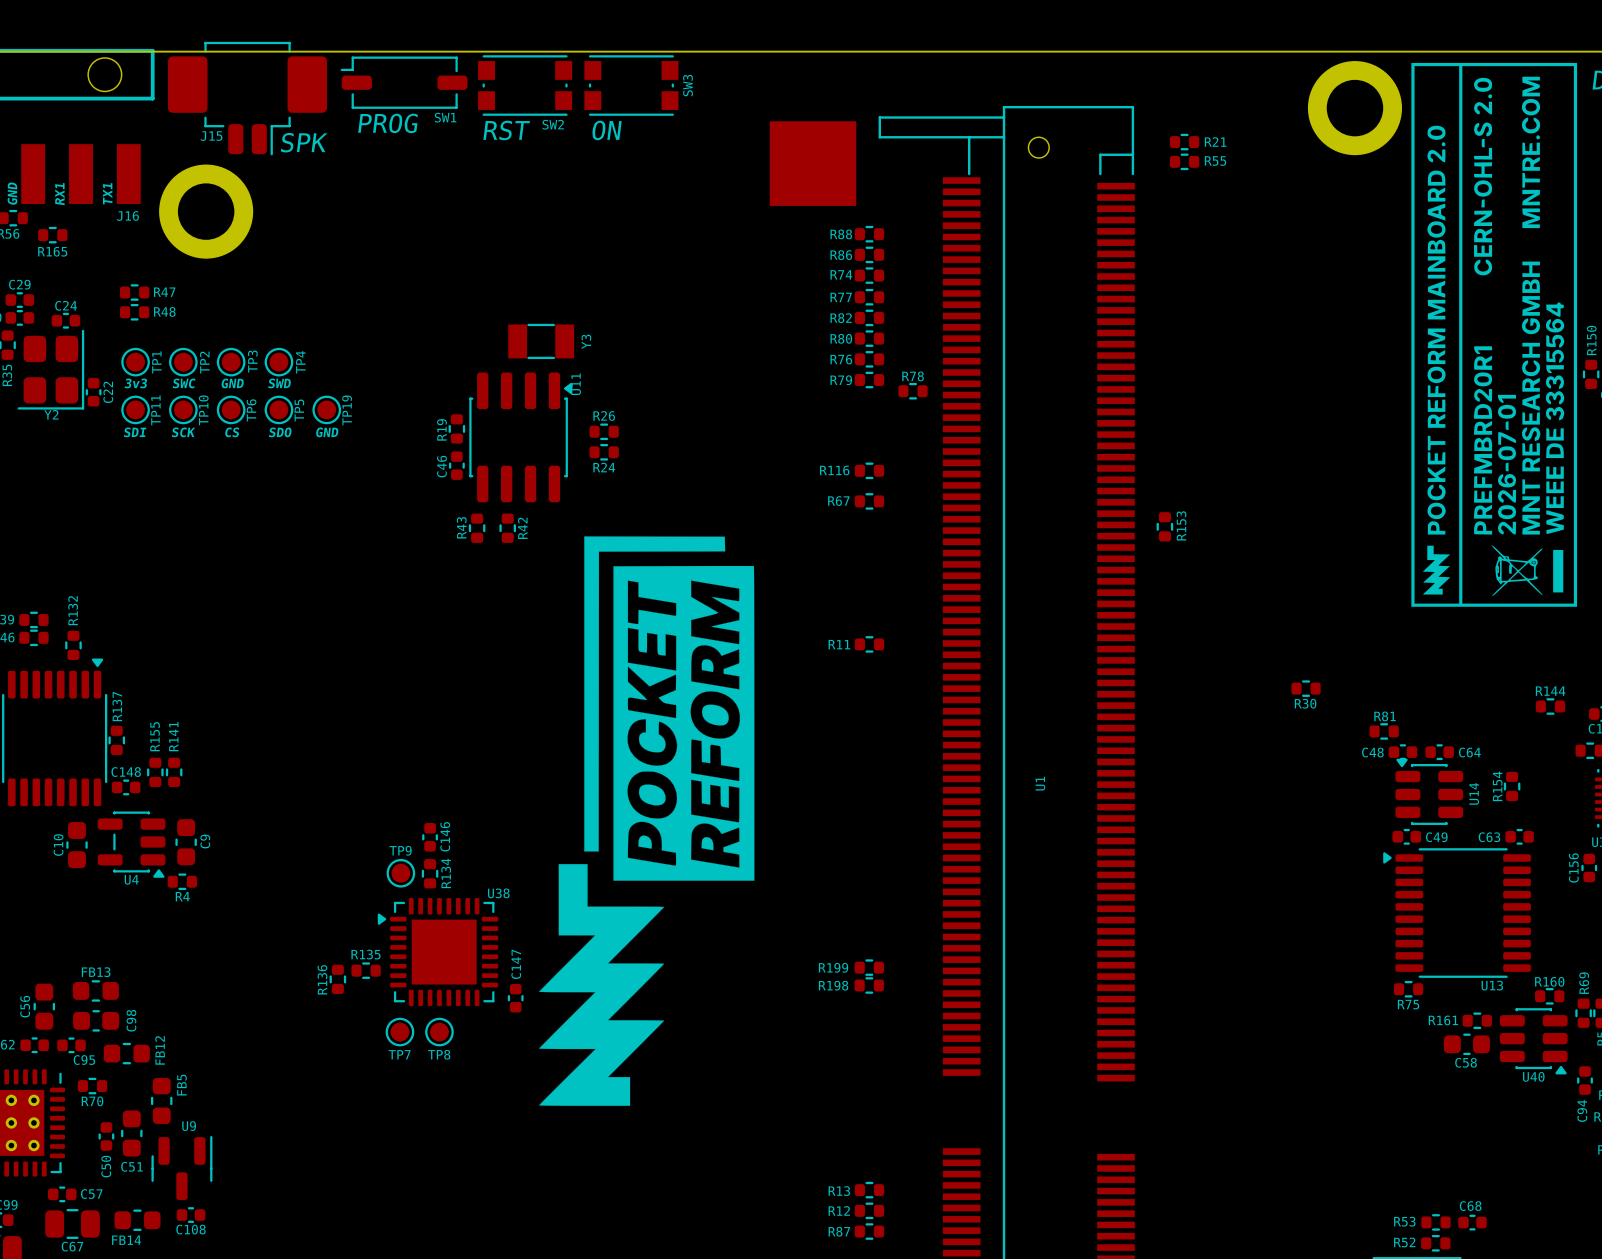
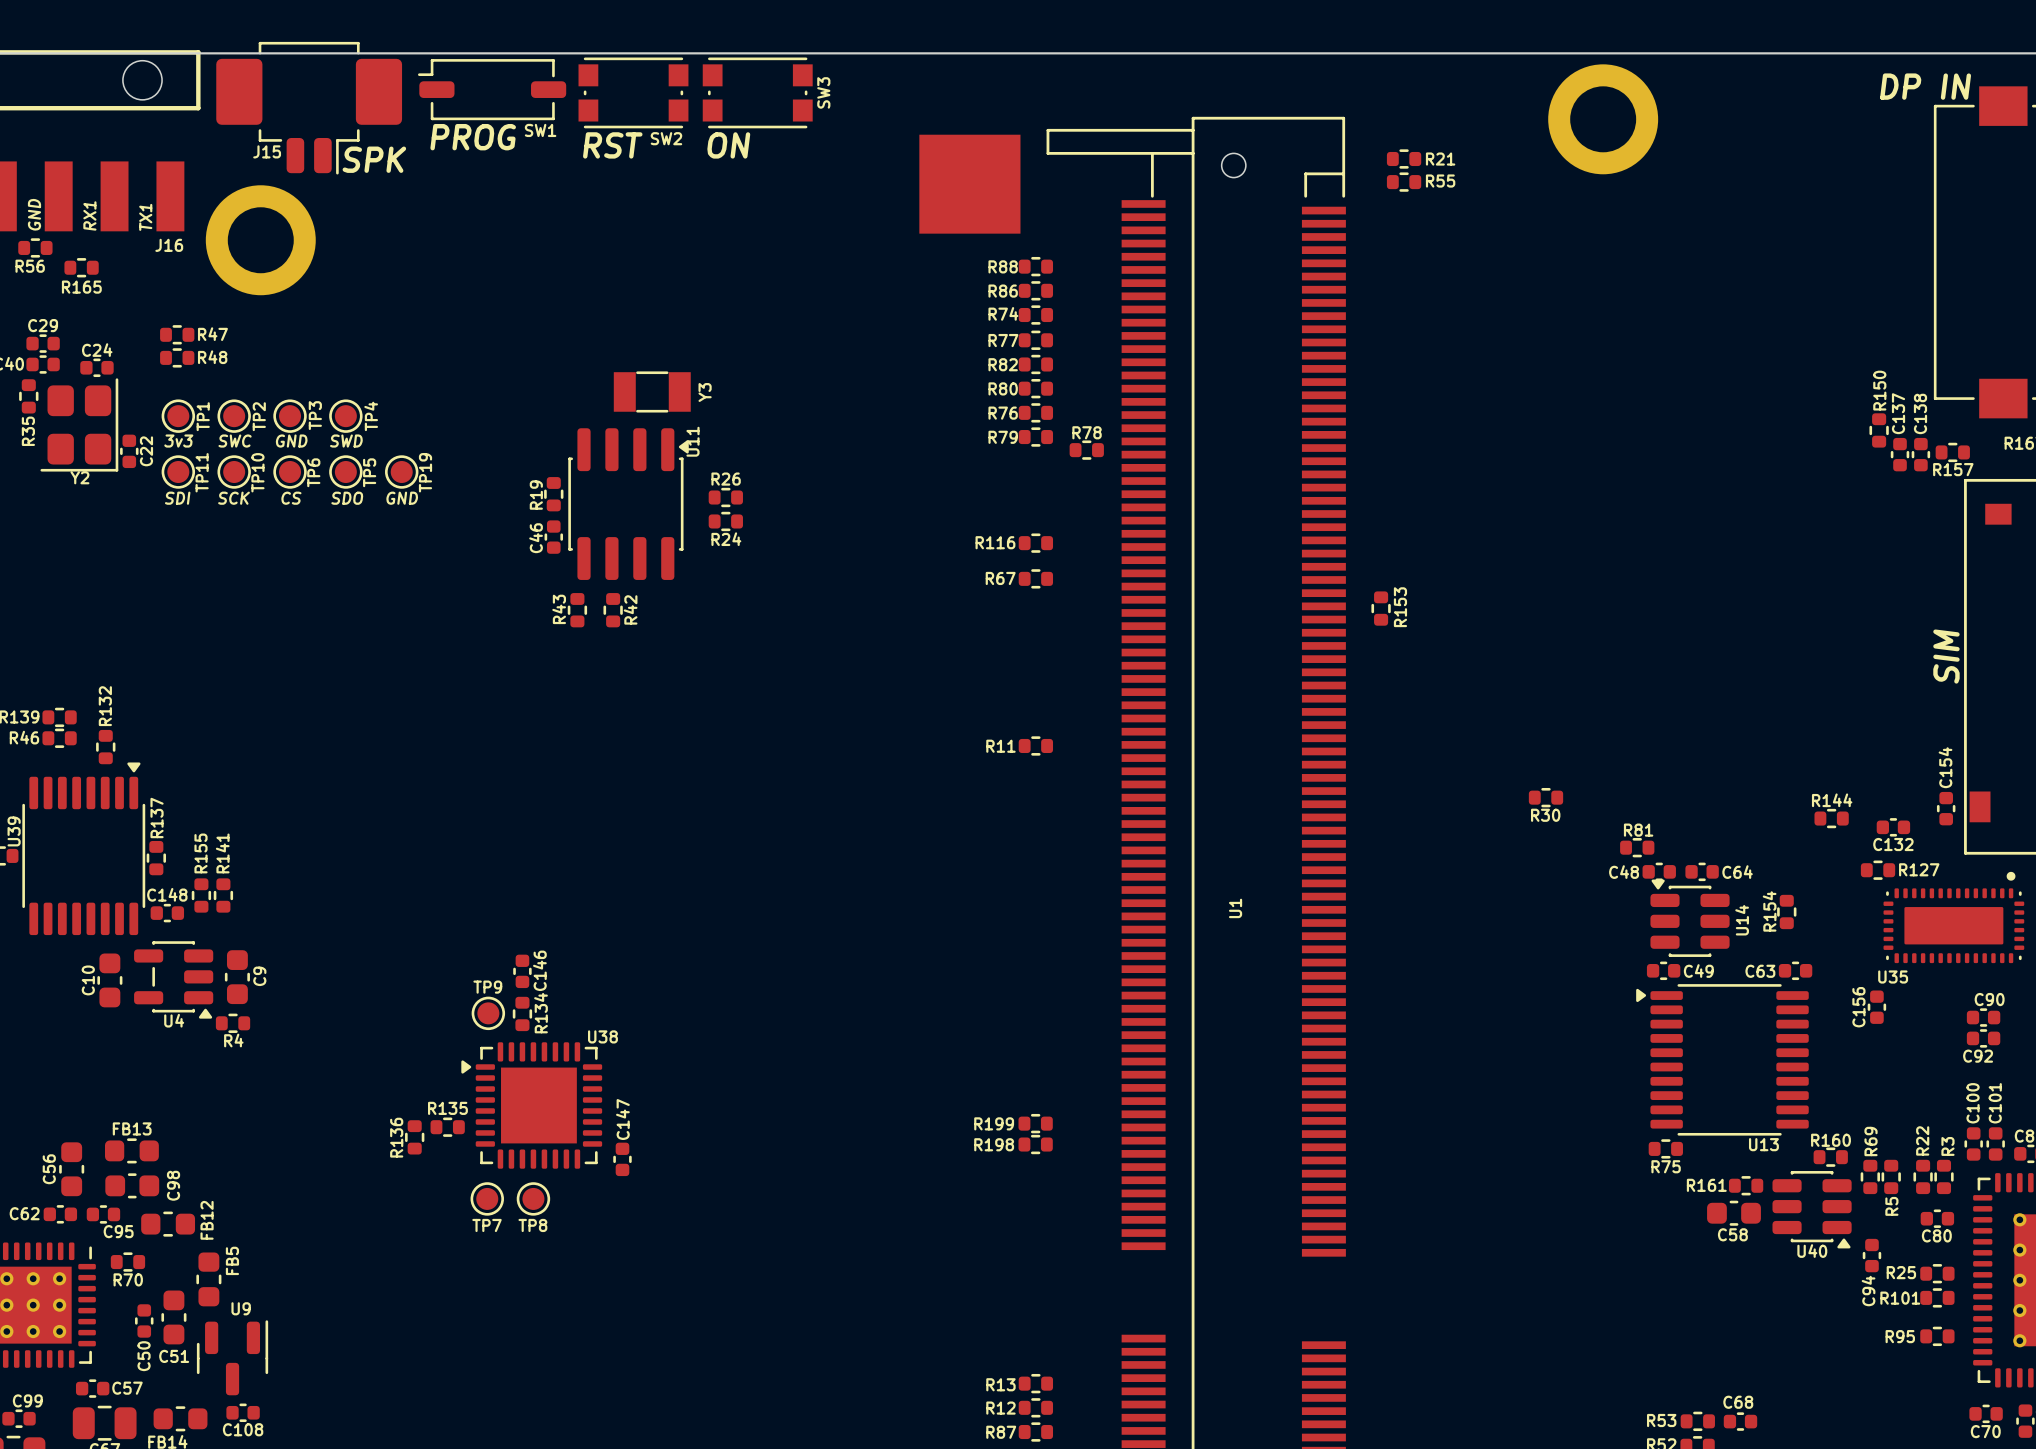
drawing: [1411, 62, 1578, 607] -> none
drawing: [539, 536, 755, 1106] -> none

